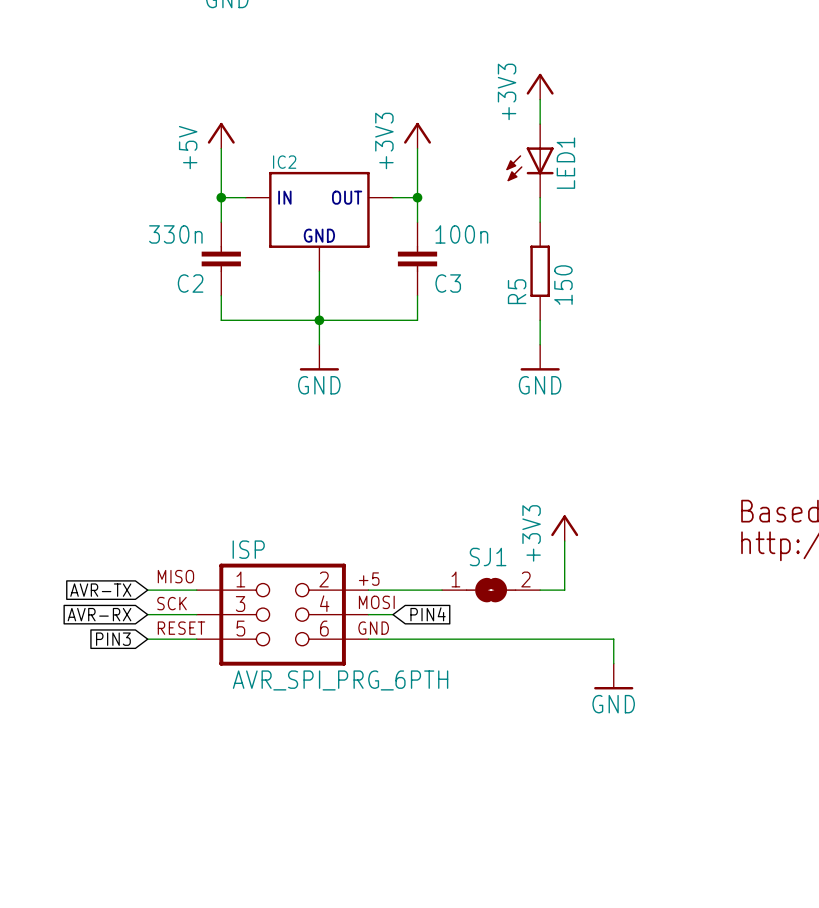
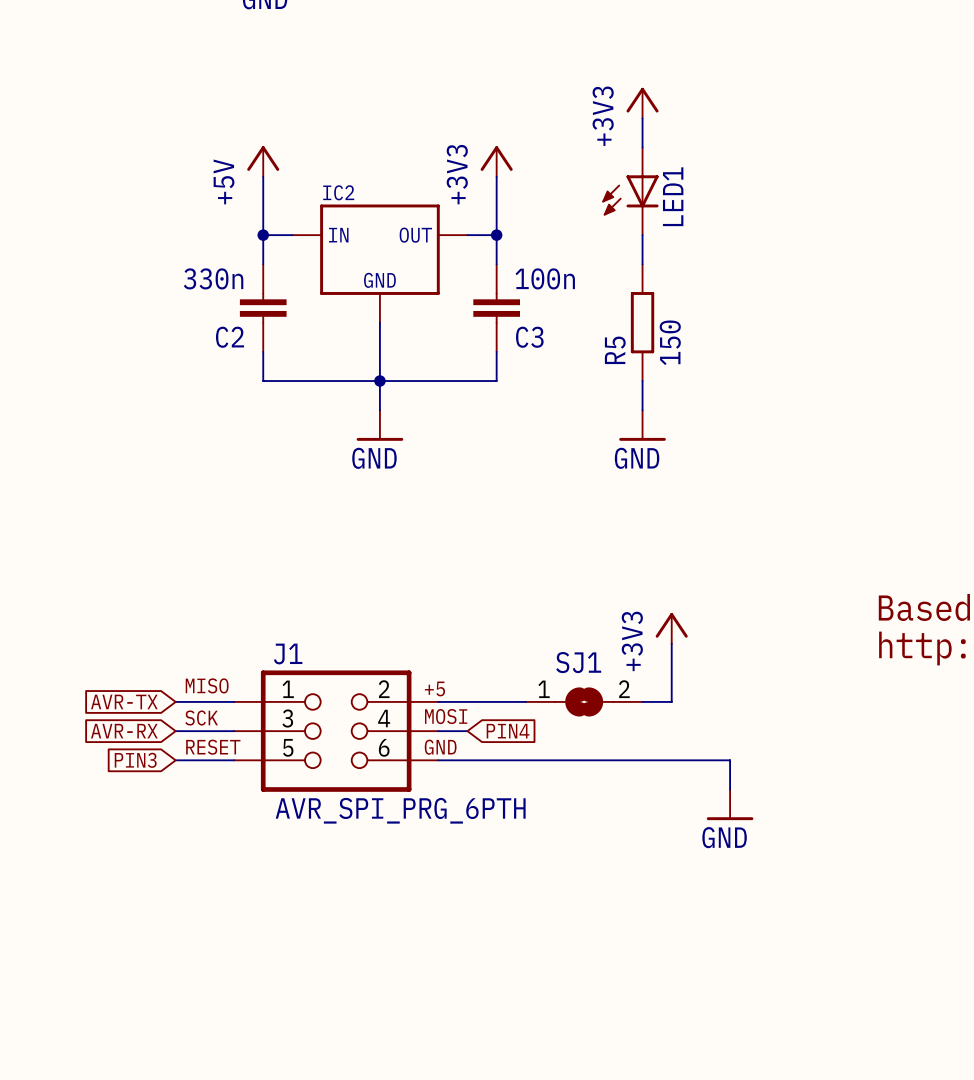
ISP name: ISP (248, 549) -> J1 (288, 654)

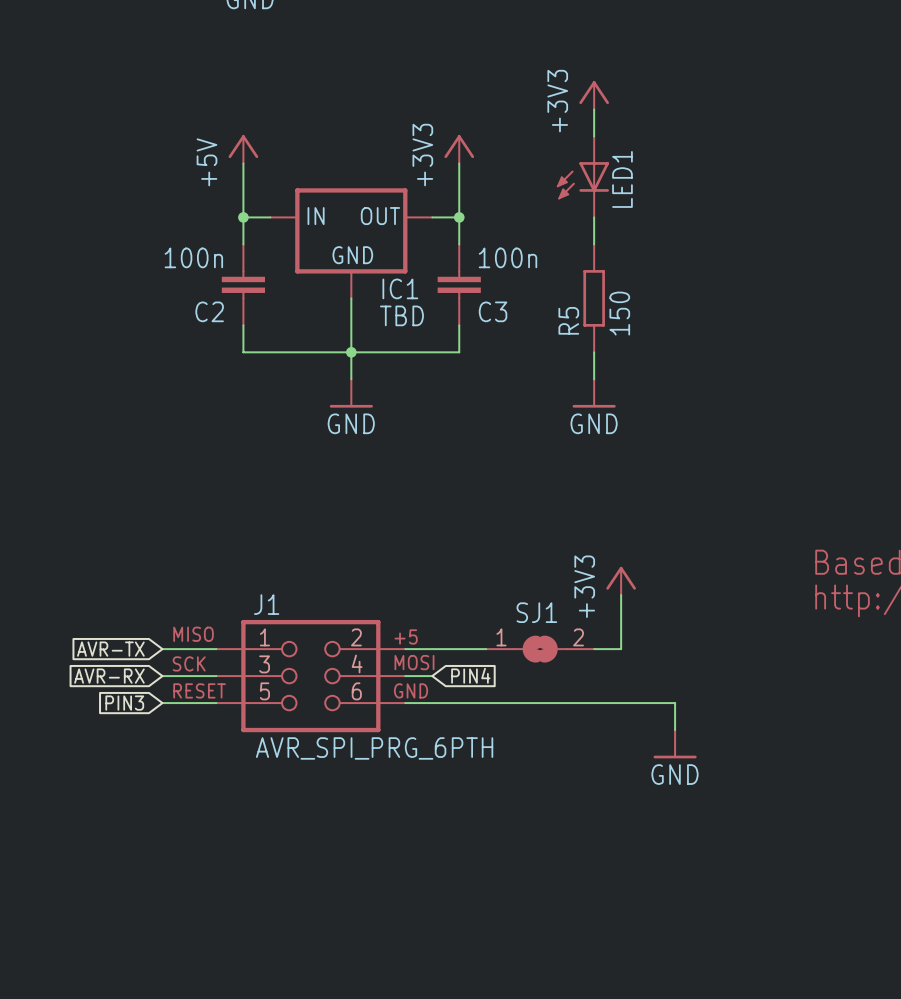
IC2: (379, 263) -> none
IC1: none -> TBD (351, 243)
C2 value: 330n (213, 278) -> 100n (193, 257)

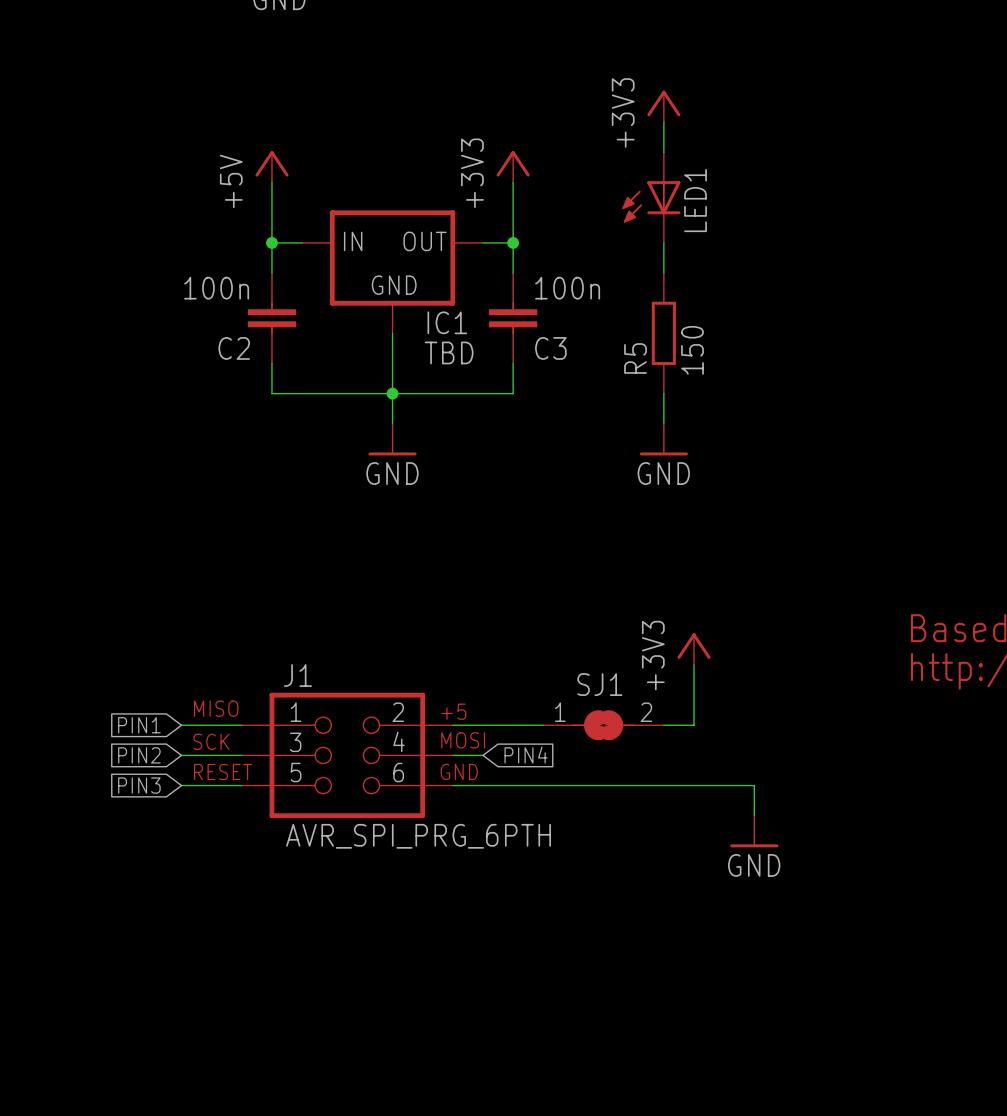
global label: AVR-TX (110, 649) -> PIN1 (139, 725)
global label: AVR-RX (109, 676) -> PIN2 (139, 755)

